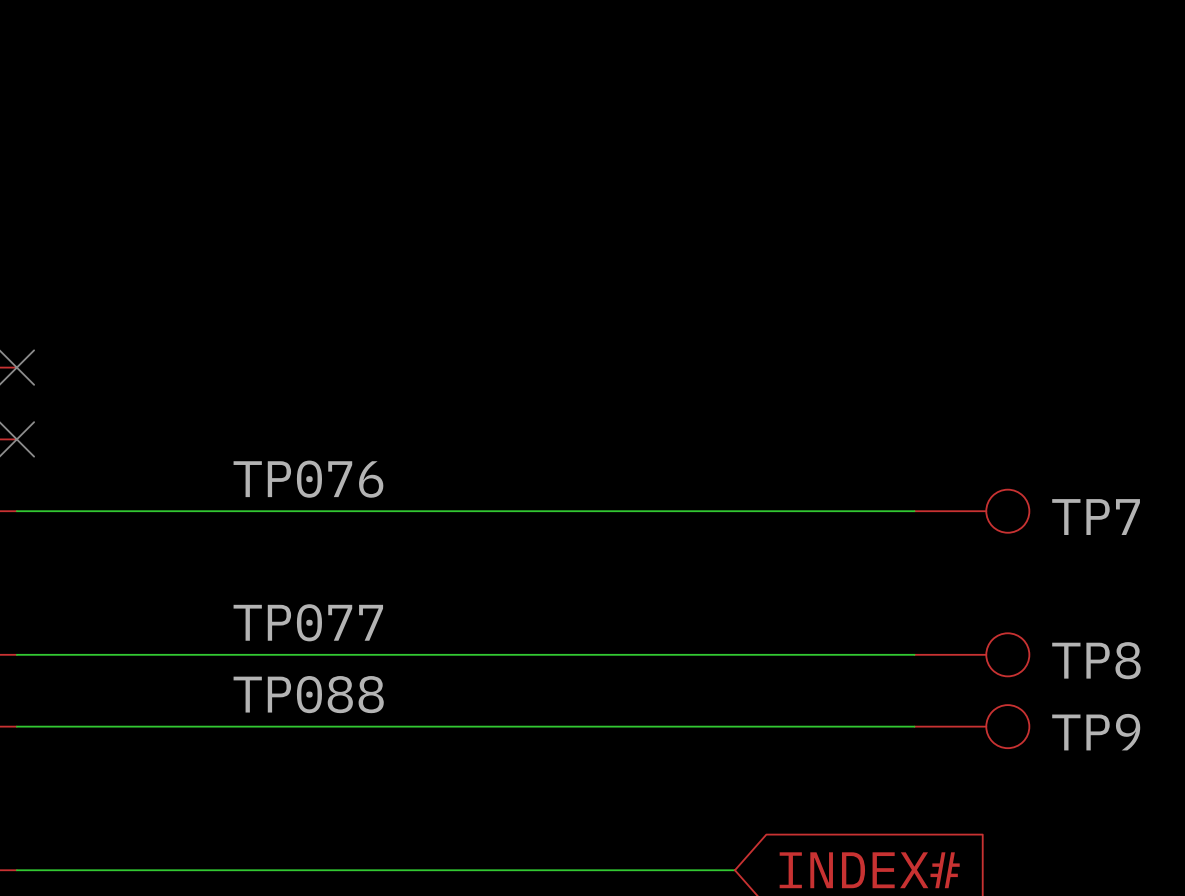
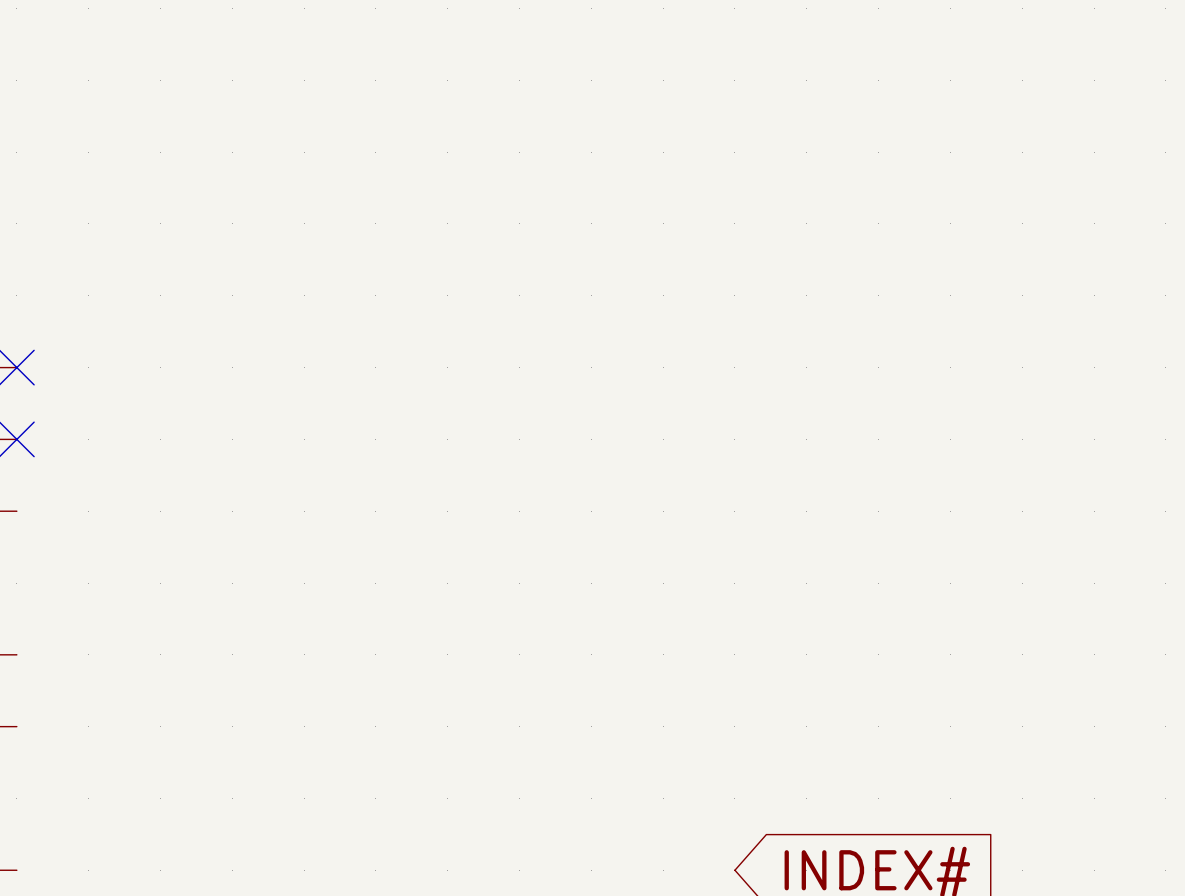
label: TP076 (308, 479) -> none
wire: (16, 511) (914, 511) -> none
TP7: (971, 511) -> none
label: TP077 (308, 622) -> none
wire: (16, 654) (914, 654) -> none
TP8: (971, 654) -> none
label: TP088 (308, 694) -> none
wire: (16, 726) (914, 726) -> none
TP9: (971, 726) -> none
wire: (16, 870) (734, 870) -> none

